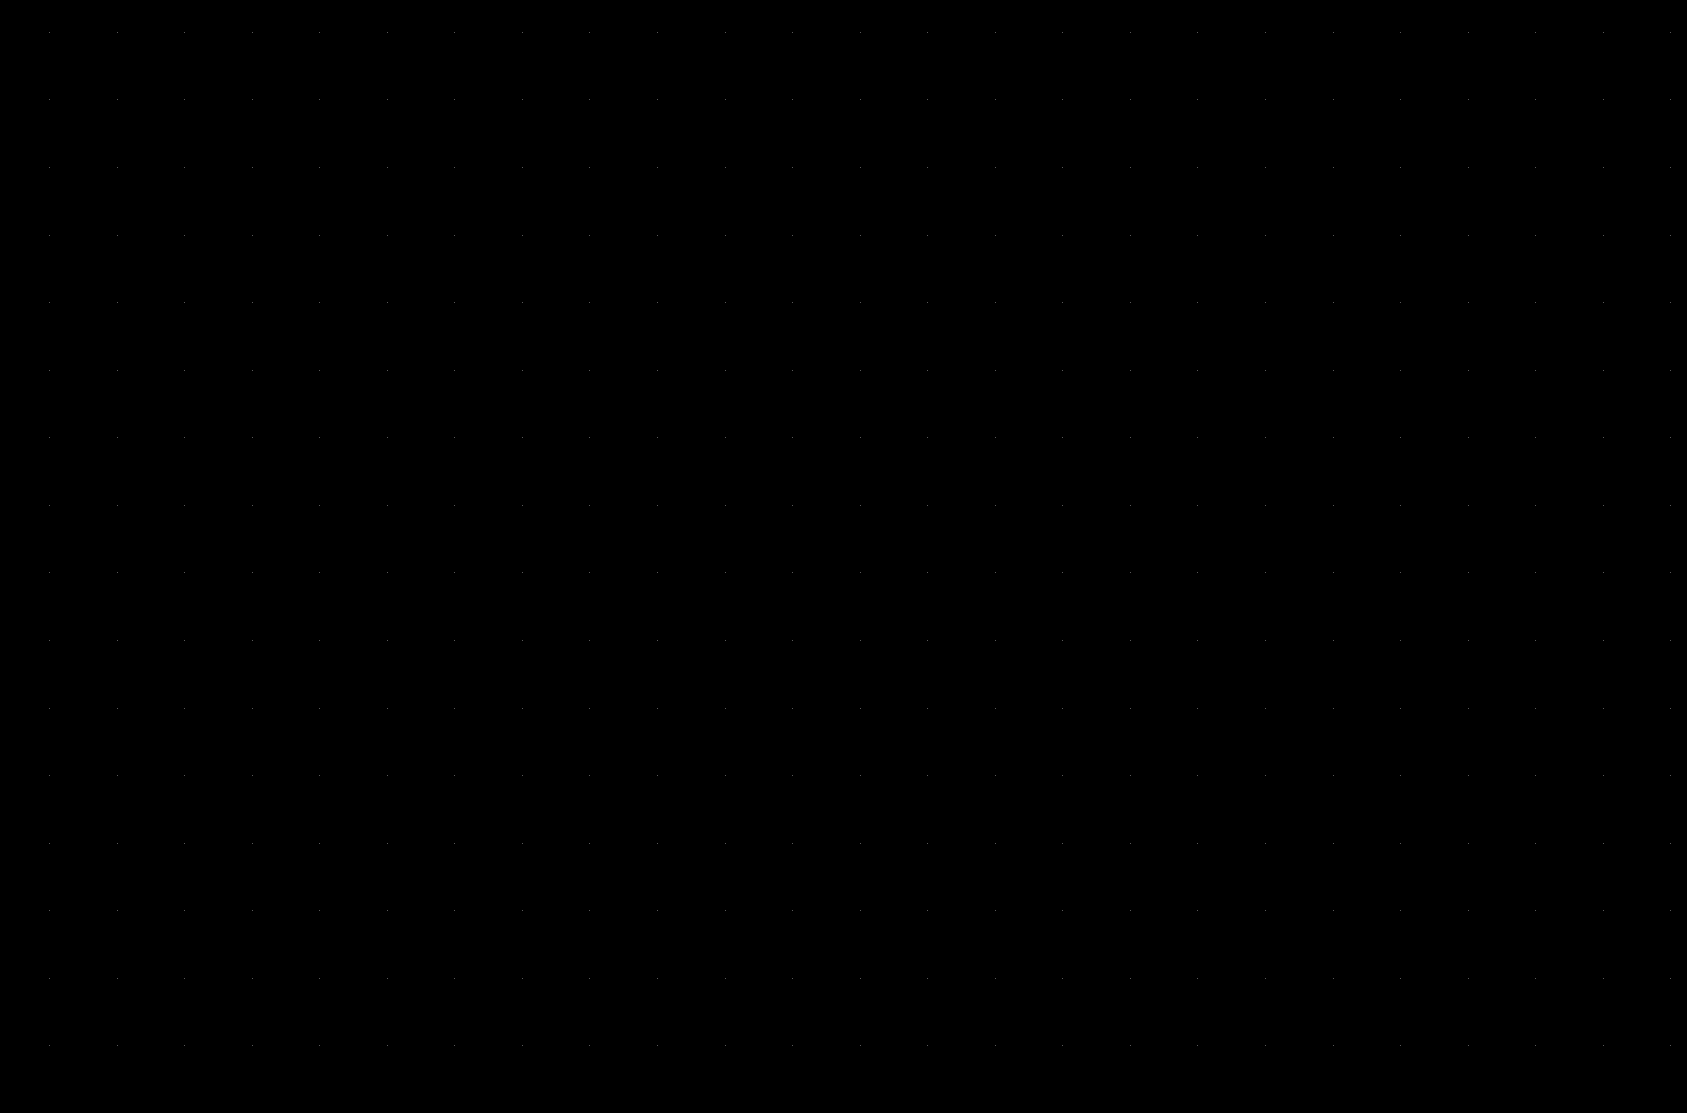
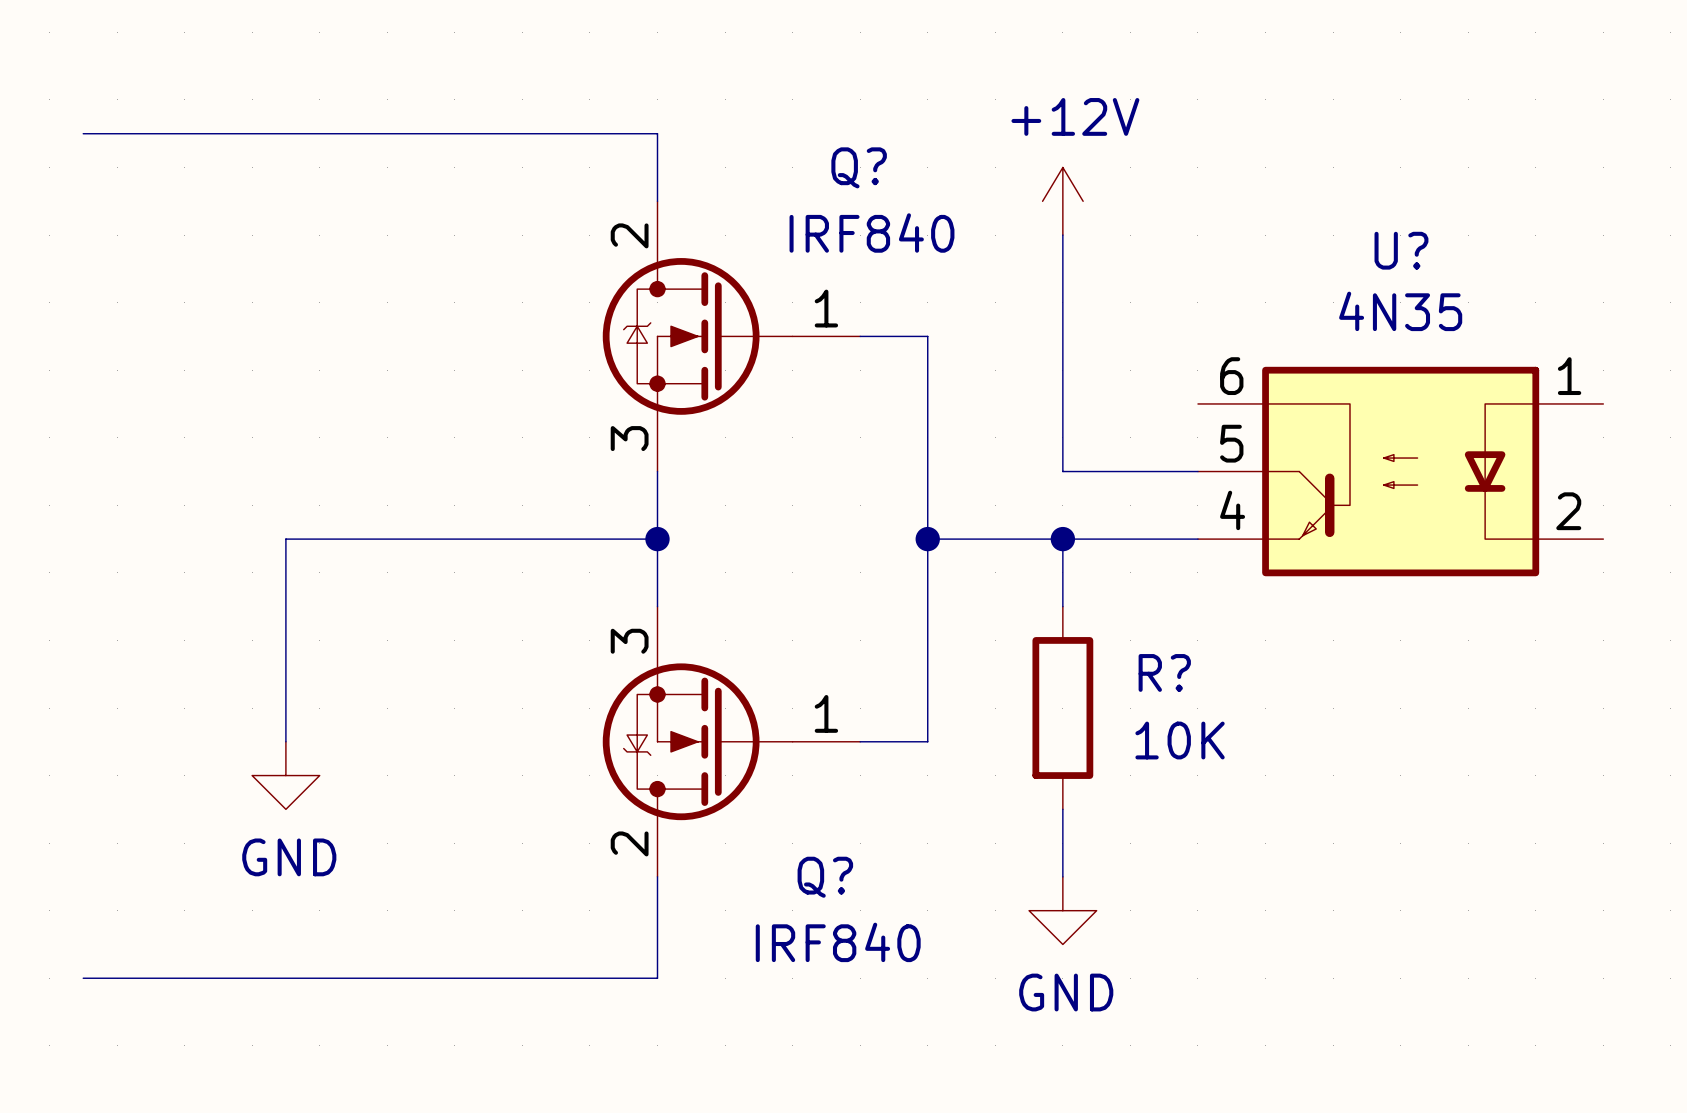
wire: none -> (83, 133) (657, 133) (657, 201)
power symbol: none -> +12V (1062, 201)
wire: none -> (1062, 235) (1062, 471) (1197, 471)
Q?: none -> IRF840 (731, 336)
wire: none -> (860, 336) (927, 336) (927, 741) (860, 741)
wire: none -> (657, 471) (657, 606)
U?: none -> 4N35 (1400, 471)
wire: none -> (657, 539) (285, 539) (285, 741)
junction: none -> (657, 539)
wire: none -> (927, 539) (1197, 539)
junction: none -> (927, 539)
wire: none -> (1062, 539) (1062, 606)
junction: none -> (1062, 539)
R?: none -> 10K (1062, 708)
Q?: none -> IRF840 (731, 741)
power symbol: none -> GND (285, 775)
wire: none -> (1062, 809) (1062, 876)
wire: none -> (657, 876) (657, 978) (83, 978)
power symbol: none -> GND (1062, 910)

